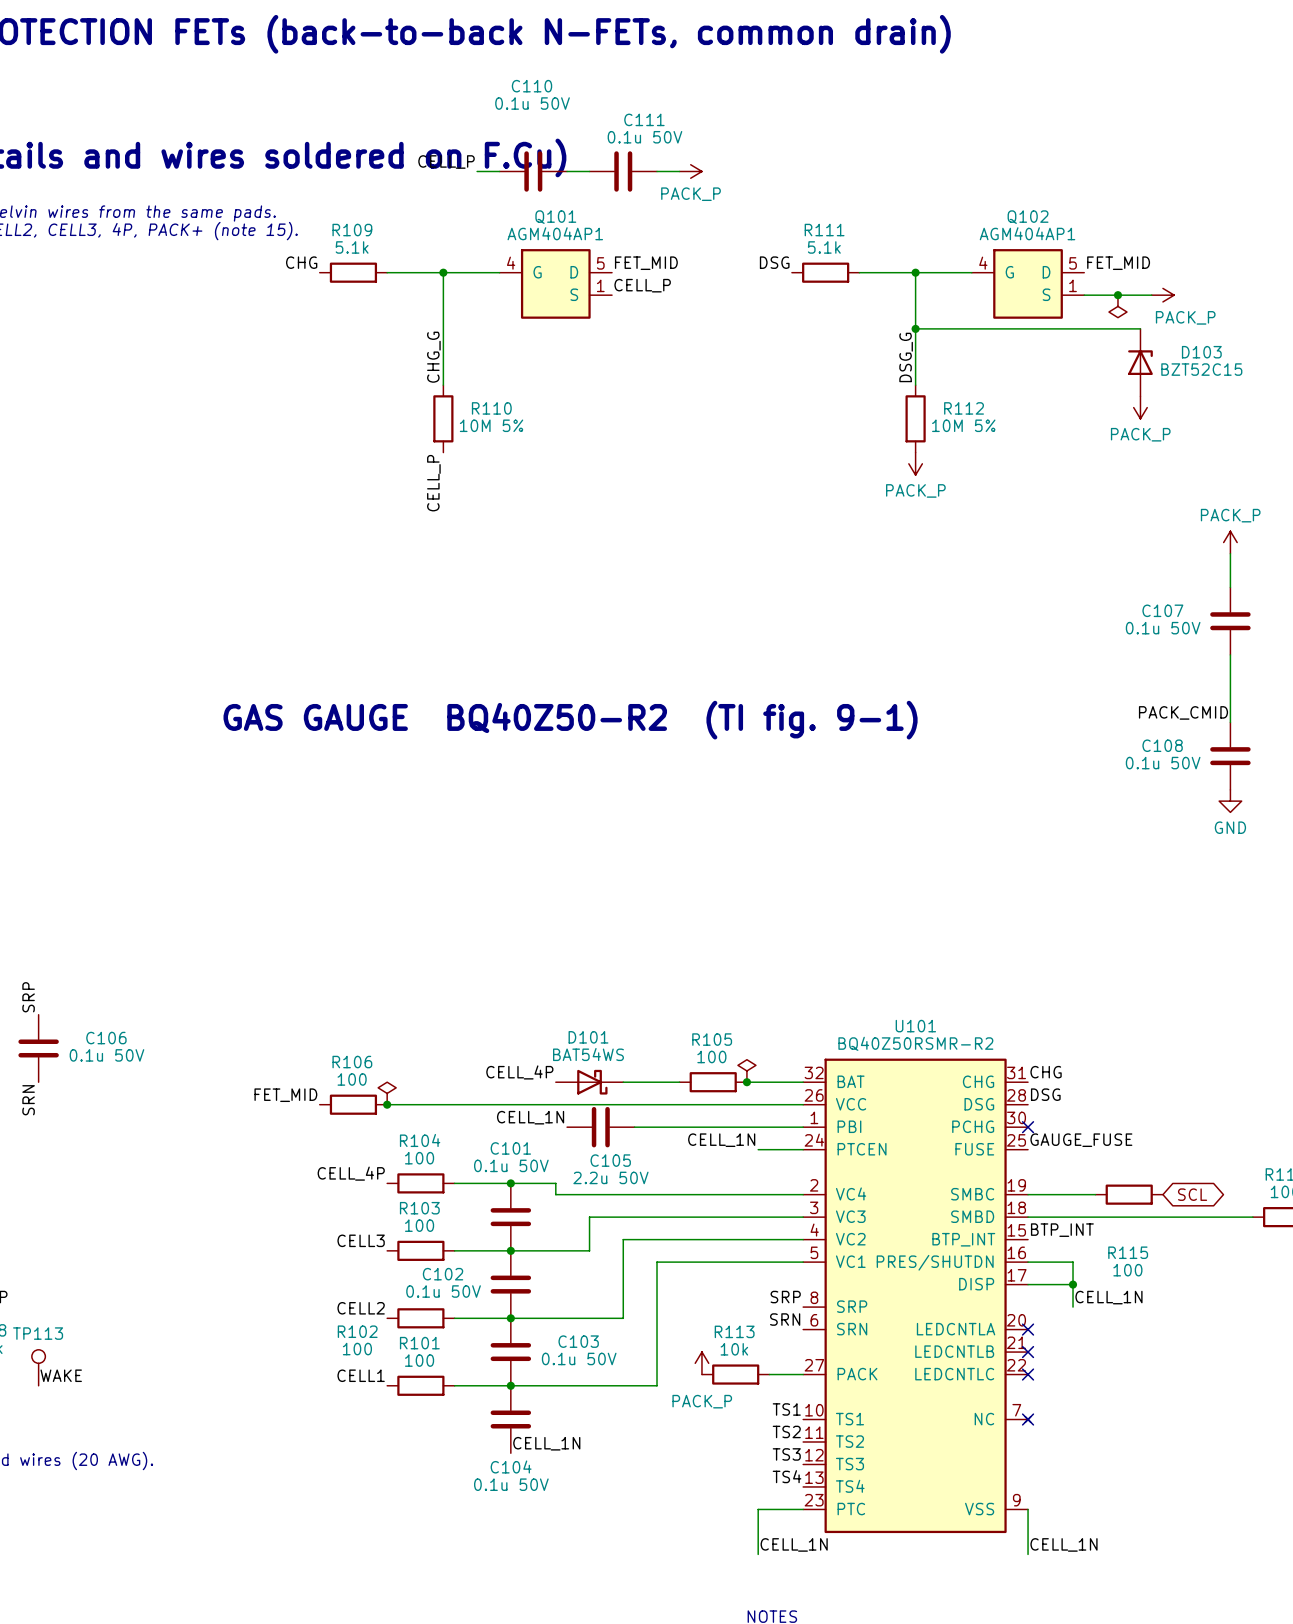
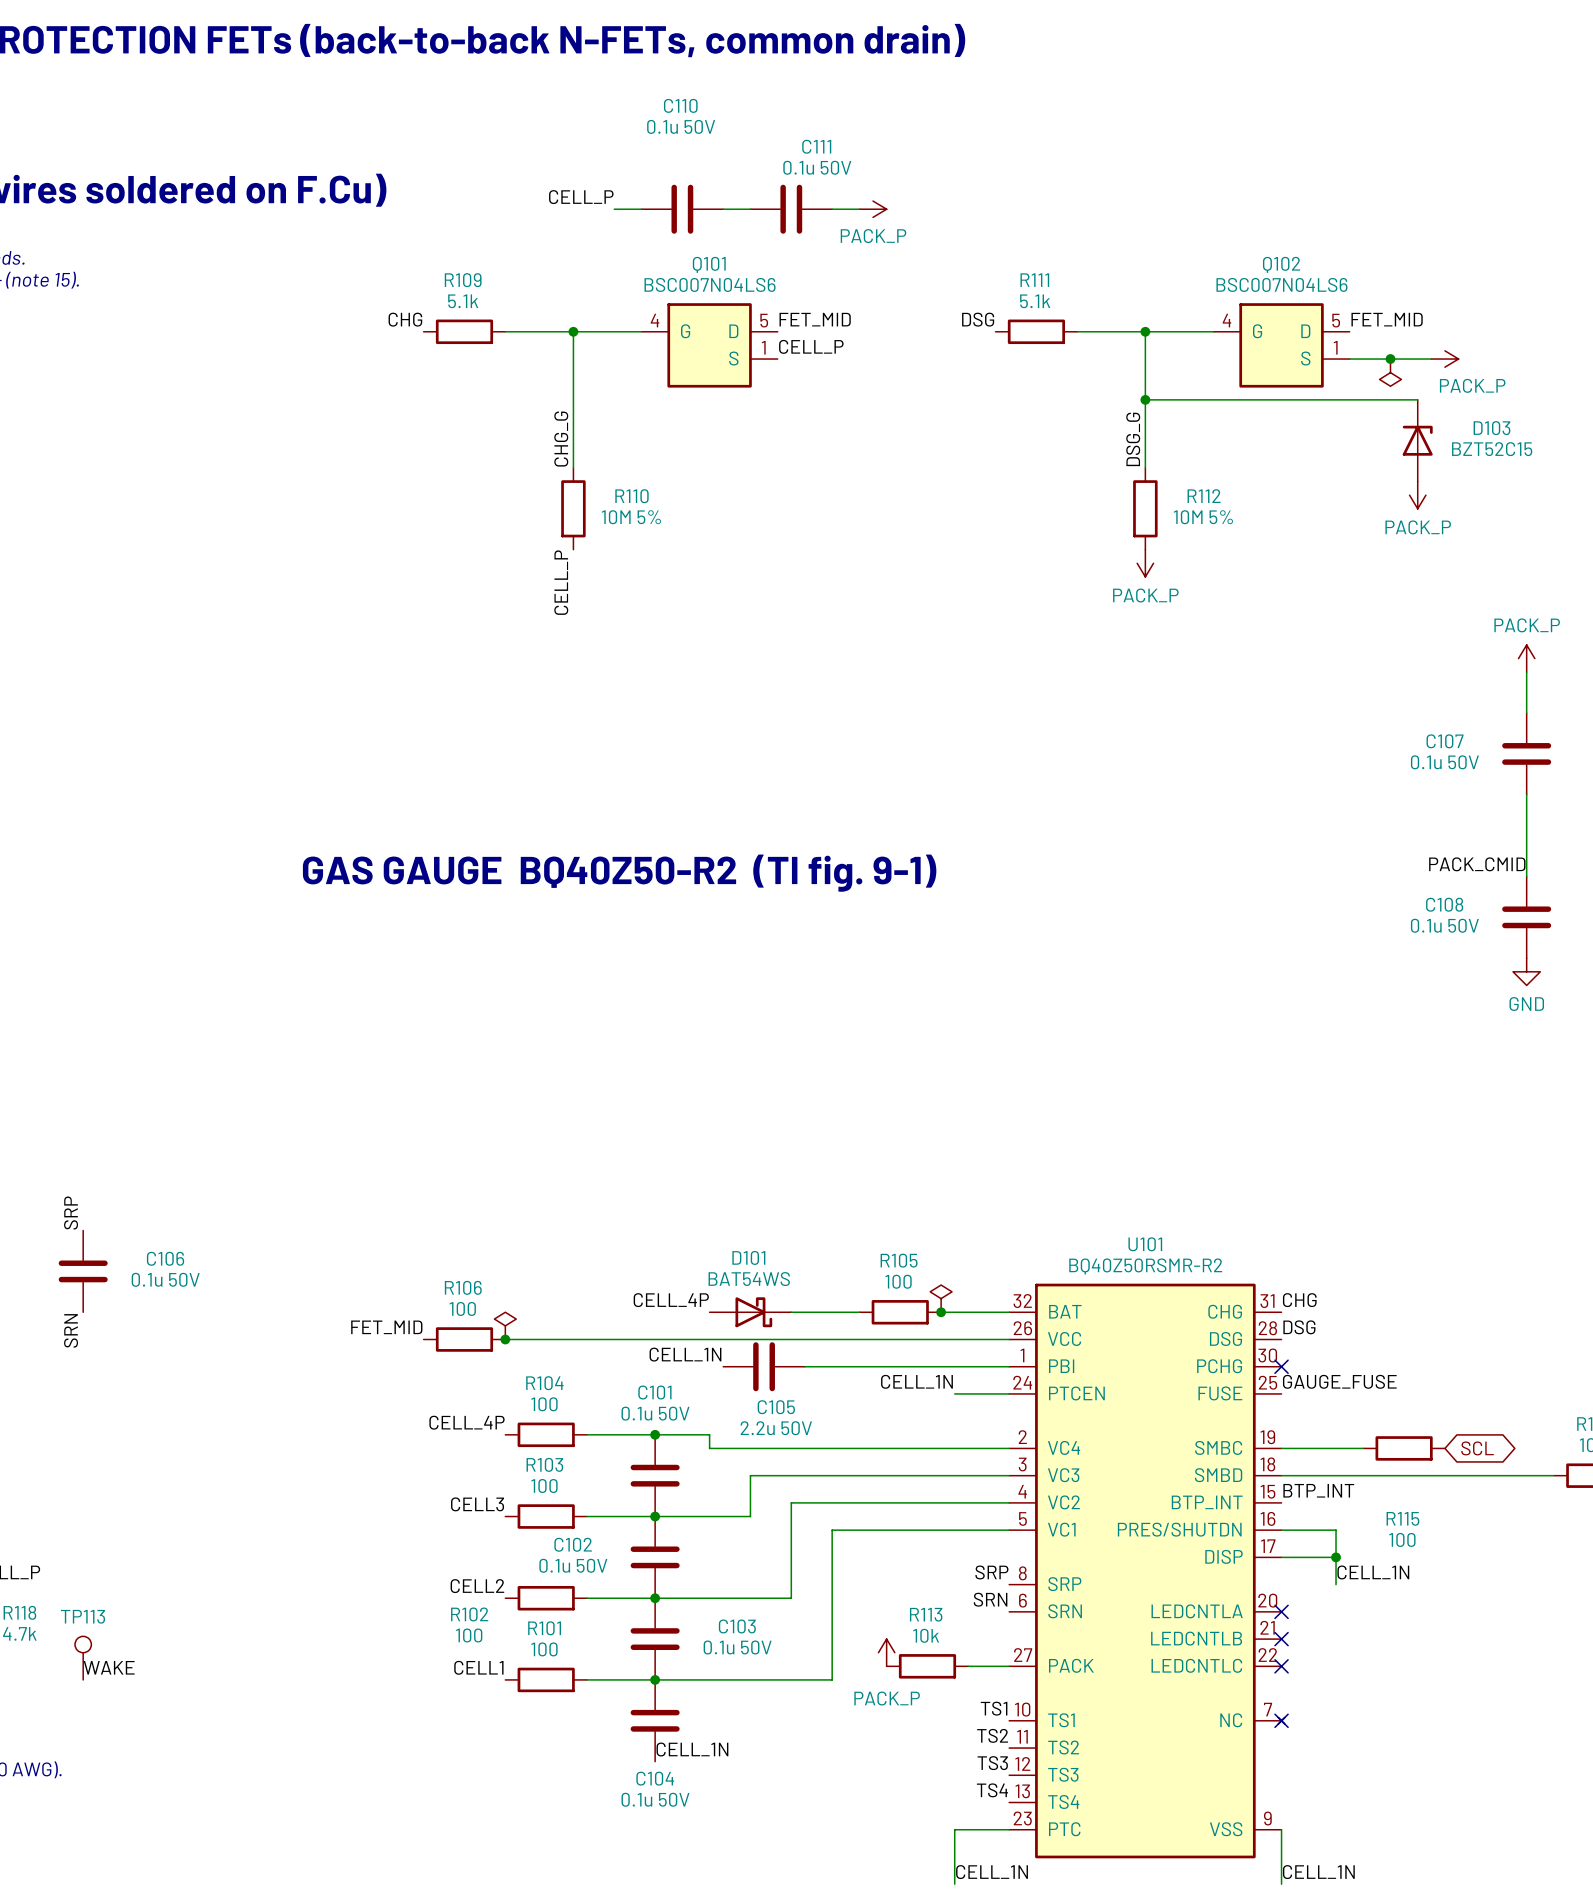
Q101 value: AGM404AP1 (555, 233) -> BSC007N04LS6 (710, 284)
Q102 value: AGM404AP1 (1027, 233) -> BSC007N04LS6 (1281, 284)

